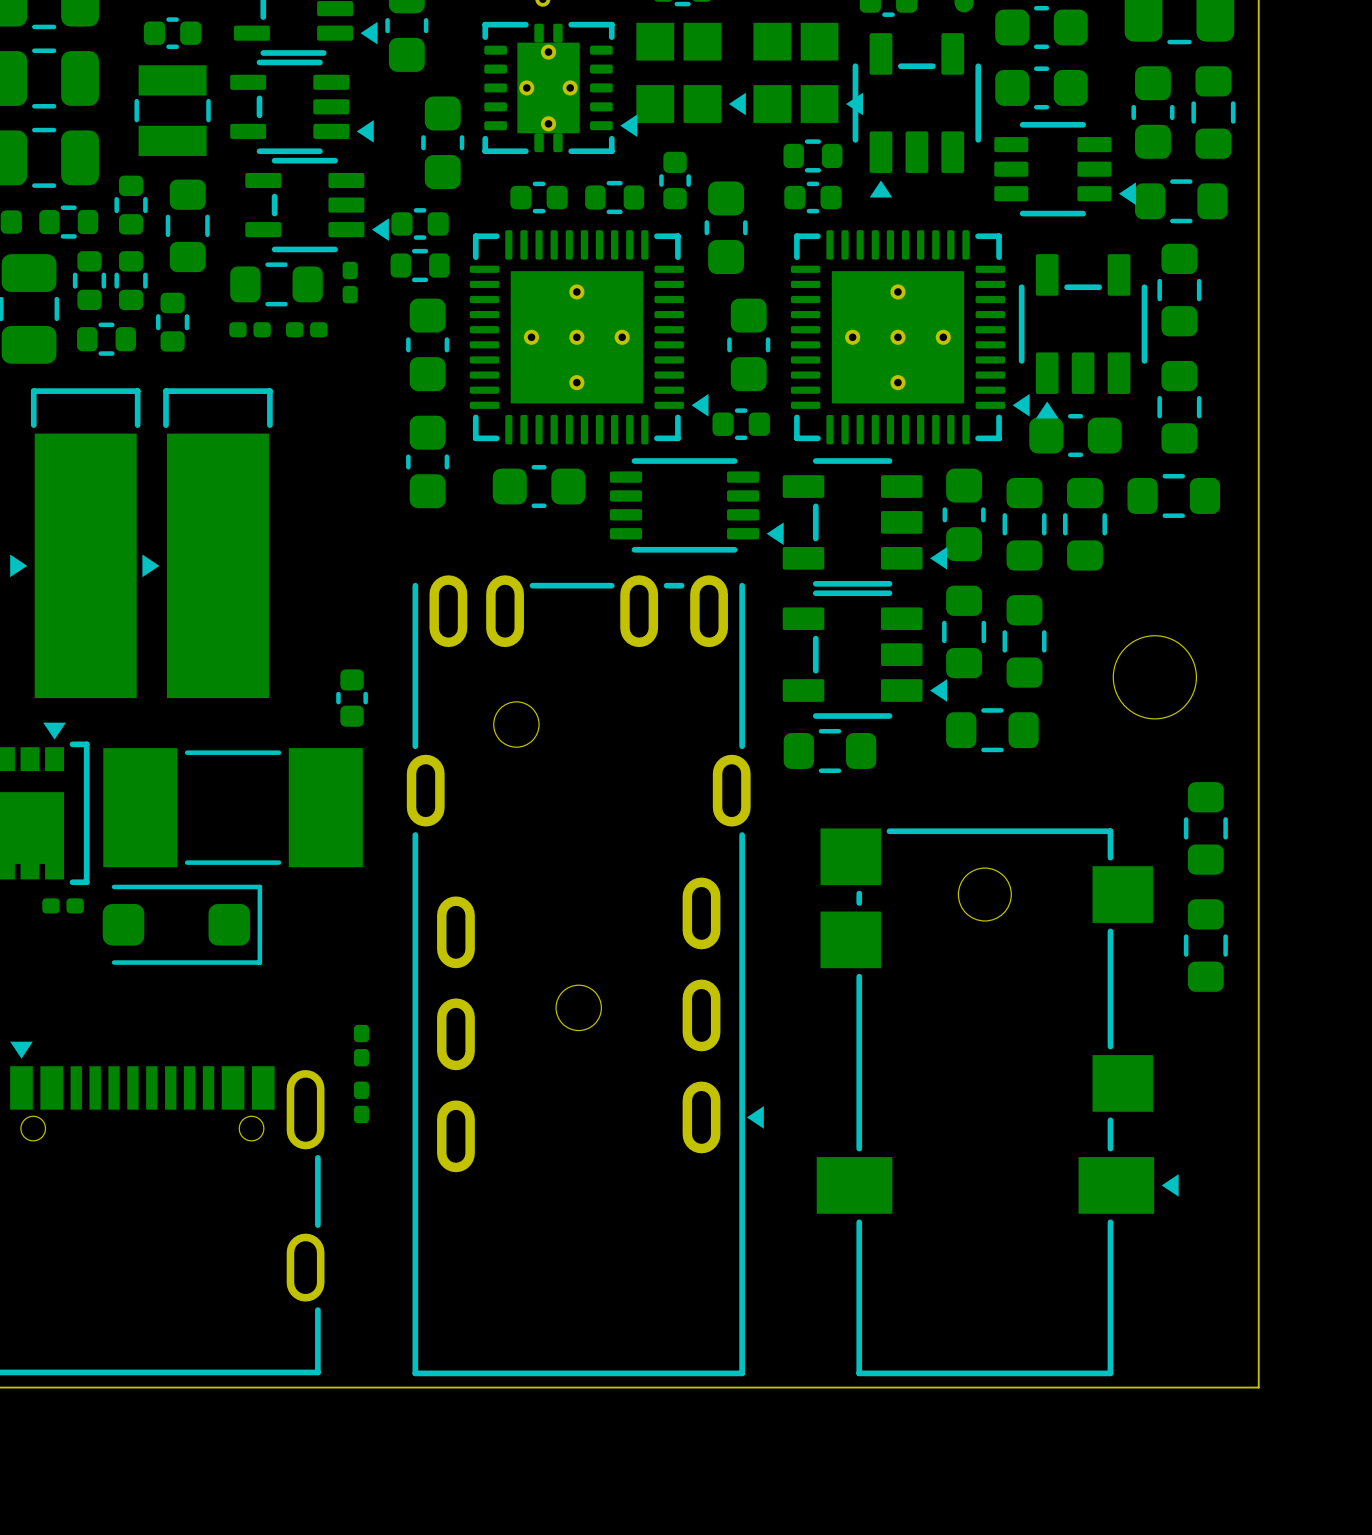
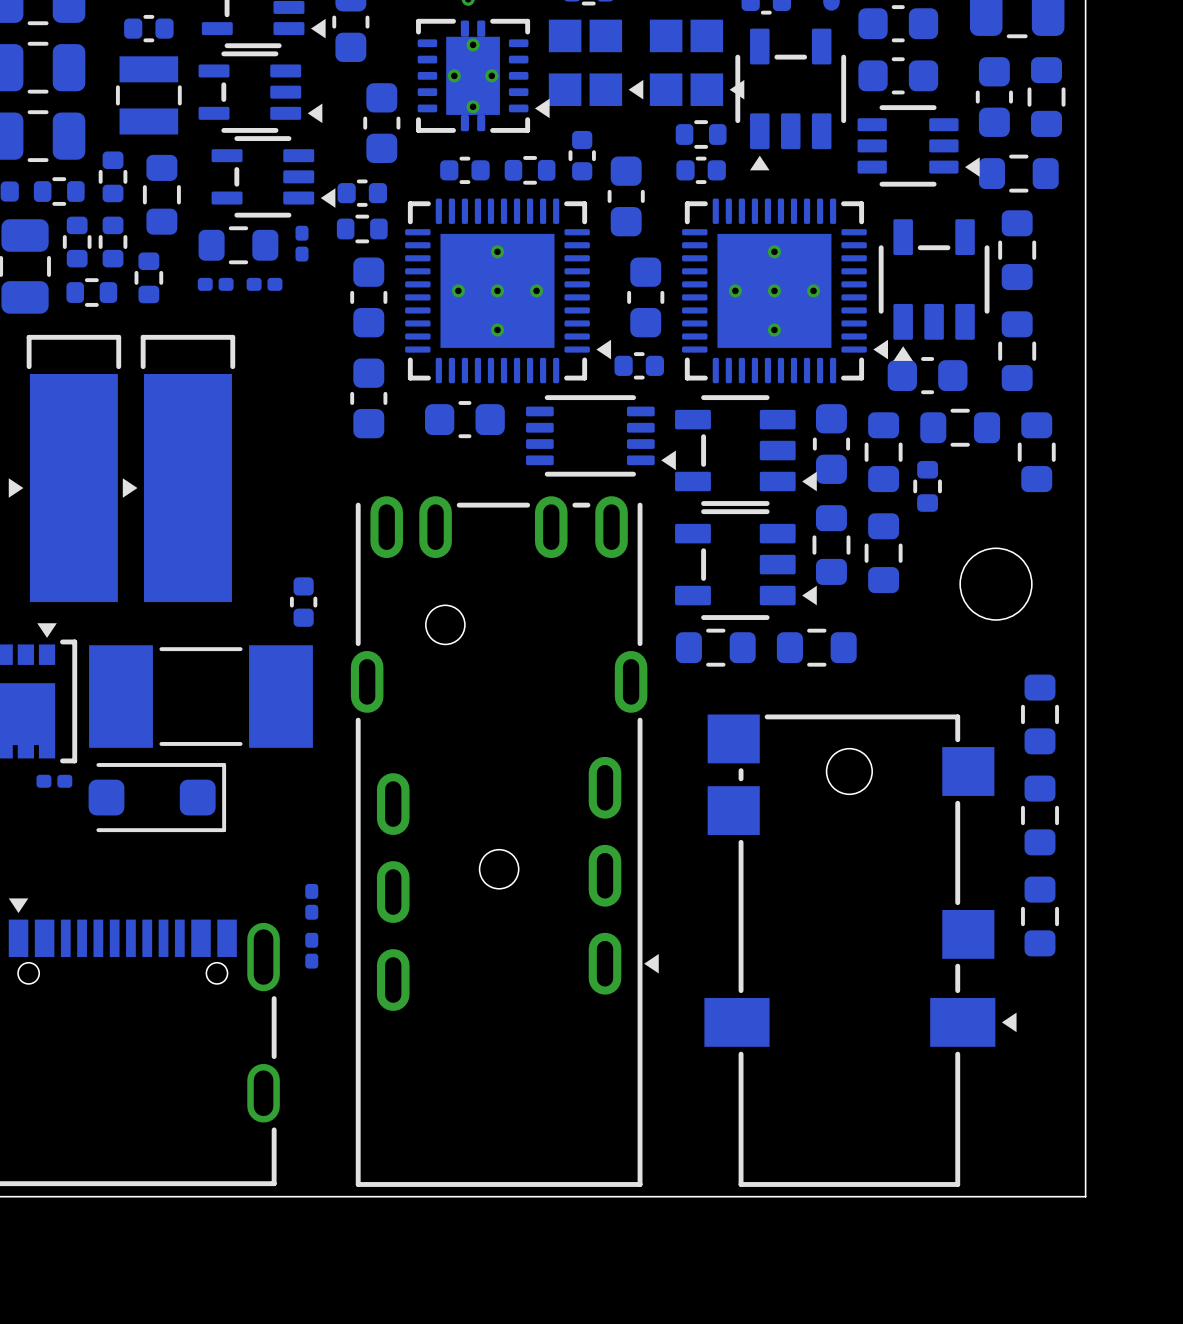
part: none -> (960, 427)
part: (1173, 495) -> none
part: (1084, 524) -> none
part: none -> (1036, 452)
part: none -> (927, 486)
part position: (992, 730) -> (816, 647)
part: none -> (1040, 916)

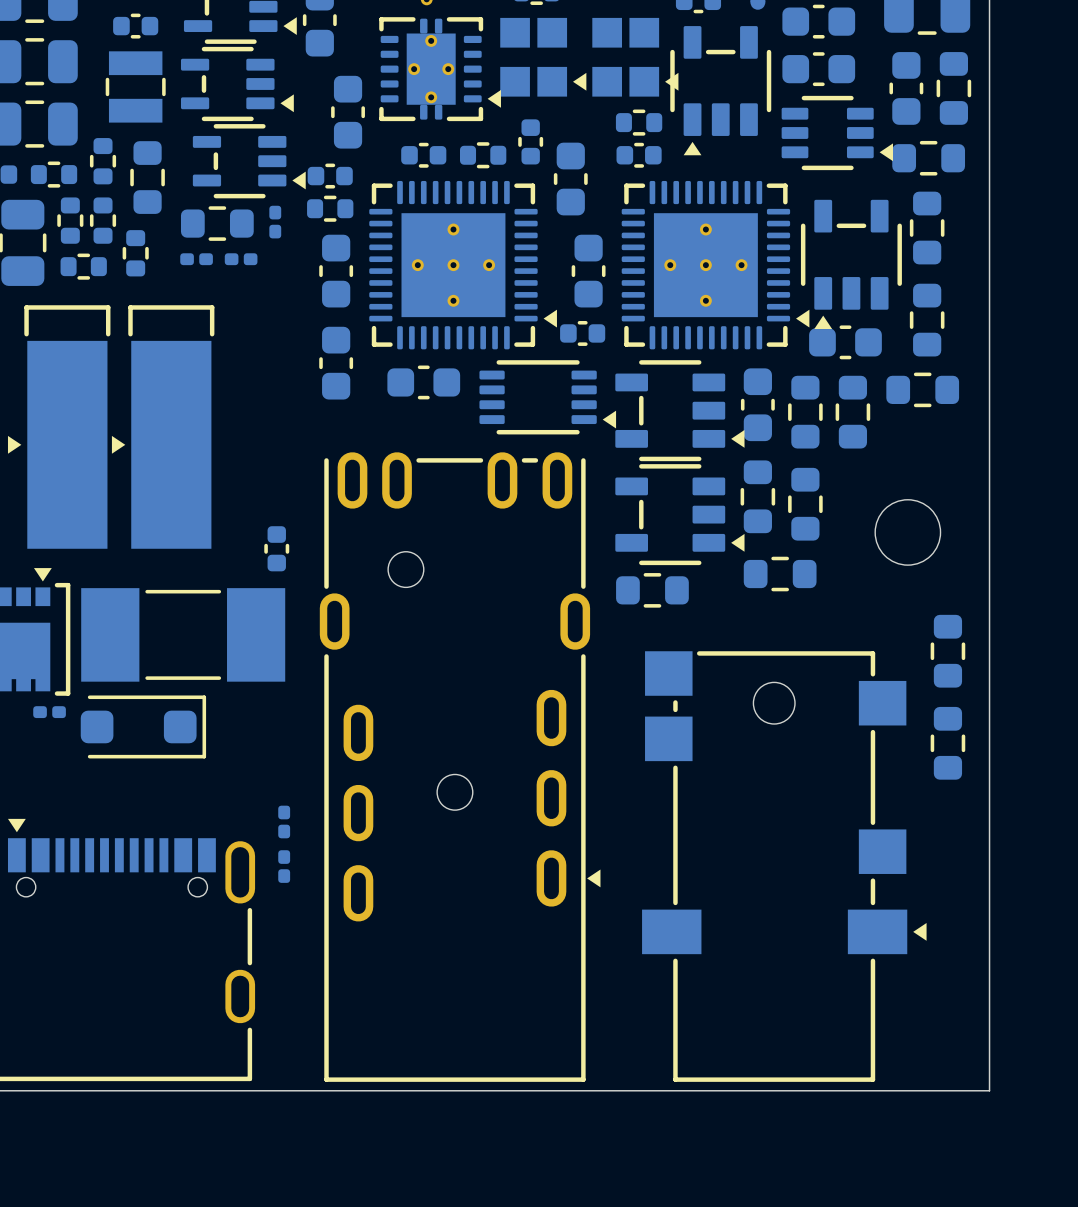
part: (960, 427) -> none
part: none -> (922, 389)
part: none -> (852, 412)
part: (1036, 452) -> none
part: (927, 486) -> none
part position: (816, 647) -> (780, 574)
part: (1040, 916) -> none

